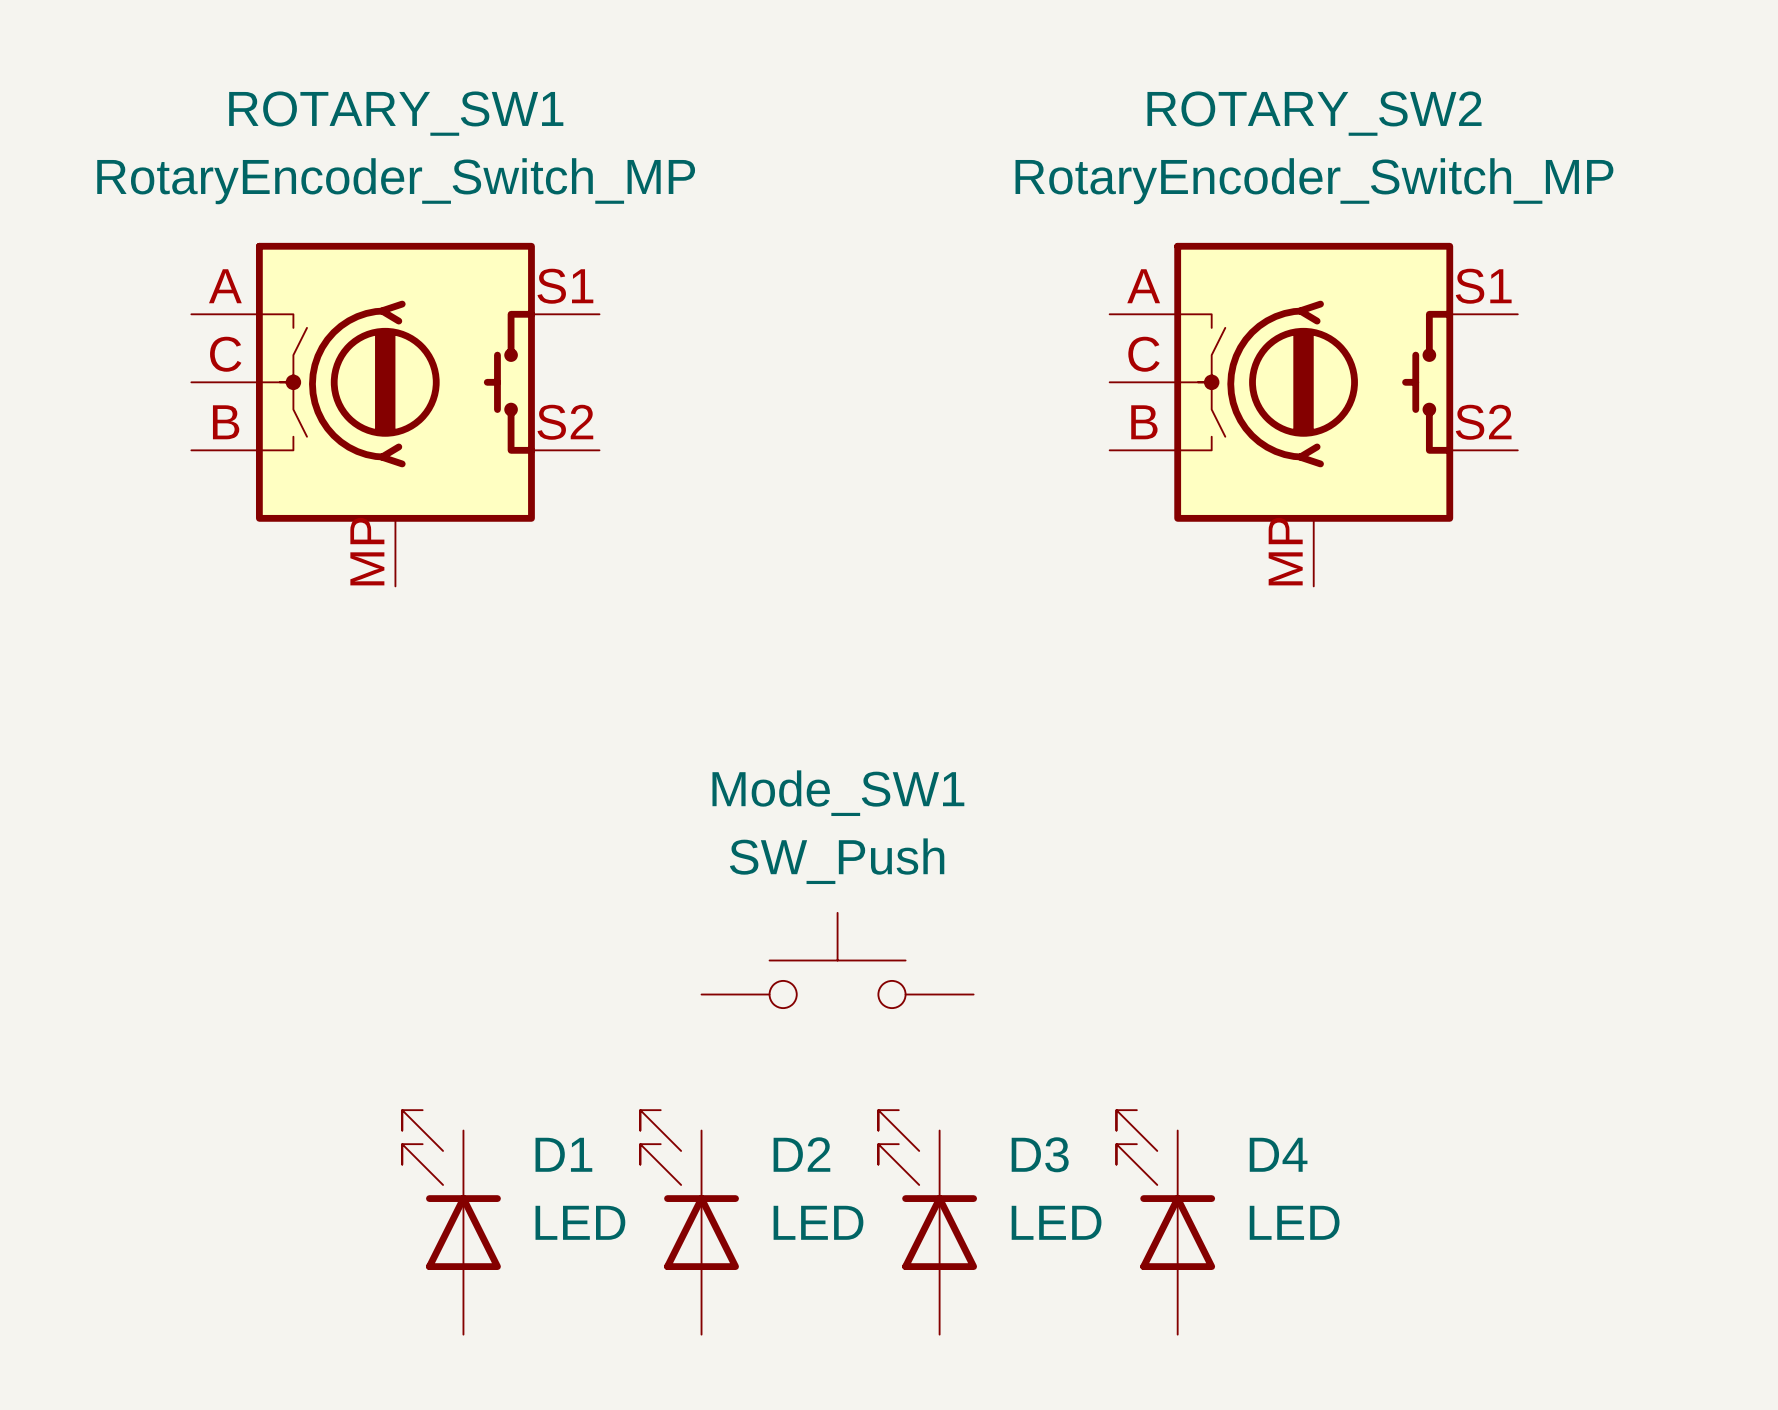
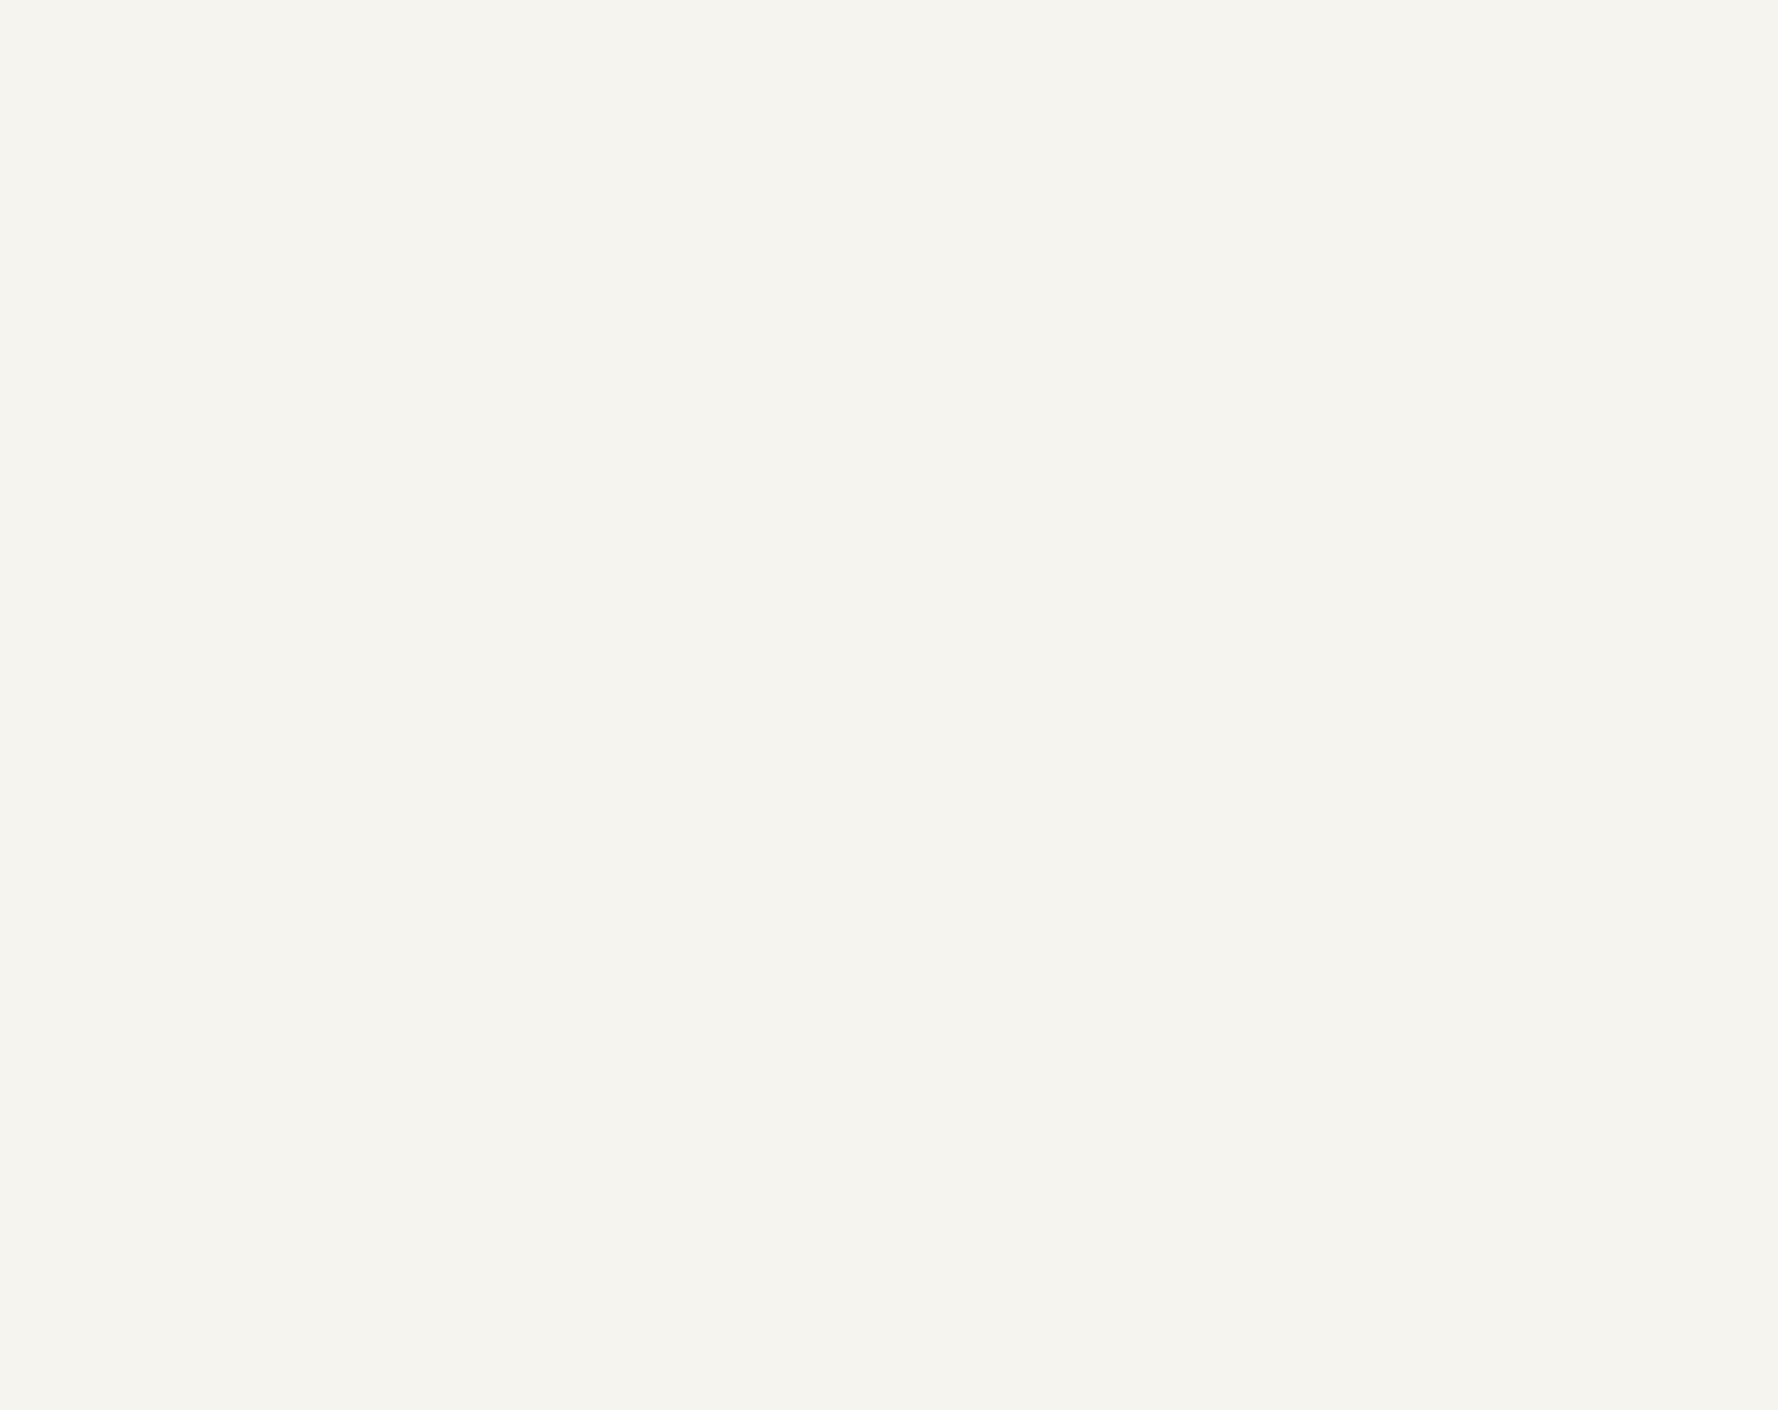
ROTARY_SW1: RotaryEncoder_Switch_MP (395, 414) -> none
ROTARY_SW2: RotaryEncoder_Switch_MP (1313, 414) -> none
Mode_SW1: SW_Push (837, 960) -> none
D1: LED (451, 1222) -> none
D2: LED (689, 1222) -> none
D3: LED (927, 1222) -> none
D4: LED (1165, 1222) -> none

